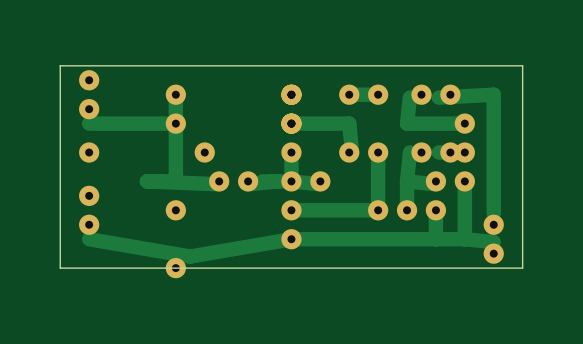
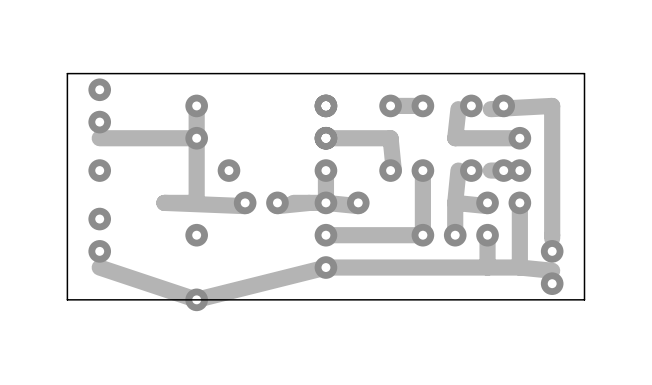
track: (291, 239) (190, 256) (89, 239) -> (325, 267) (196, 299) (99, 267)

